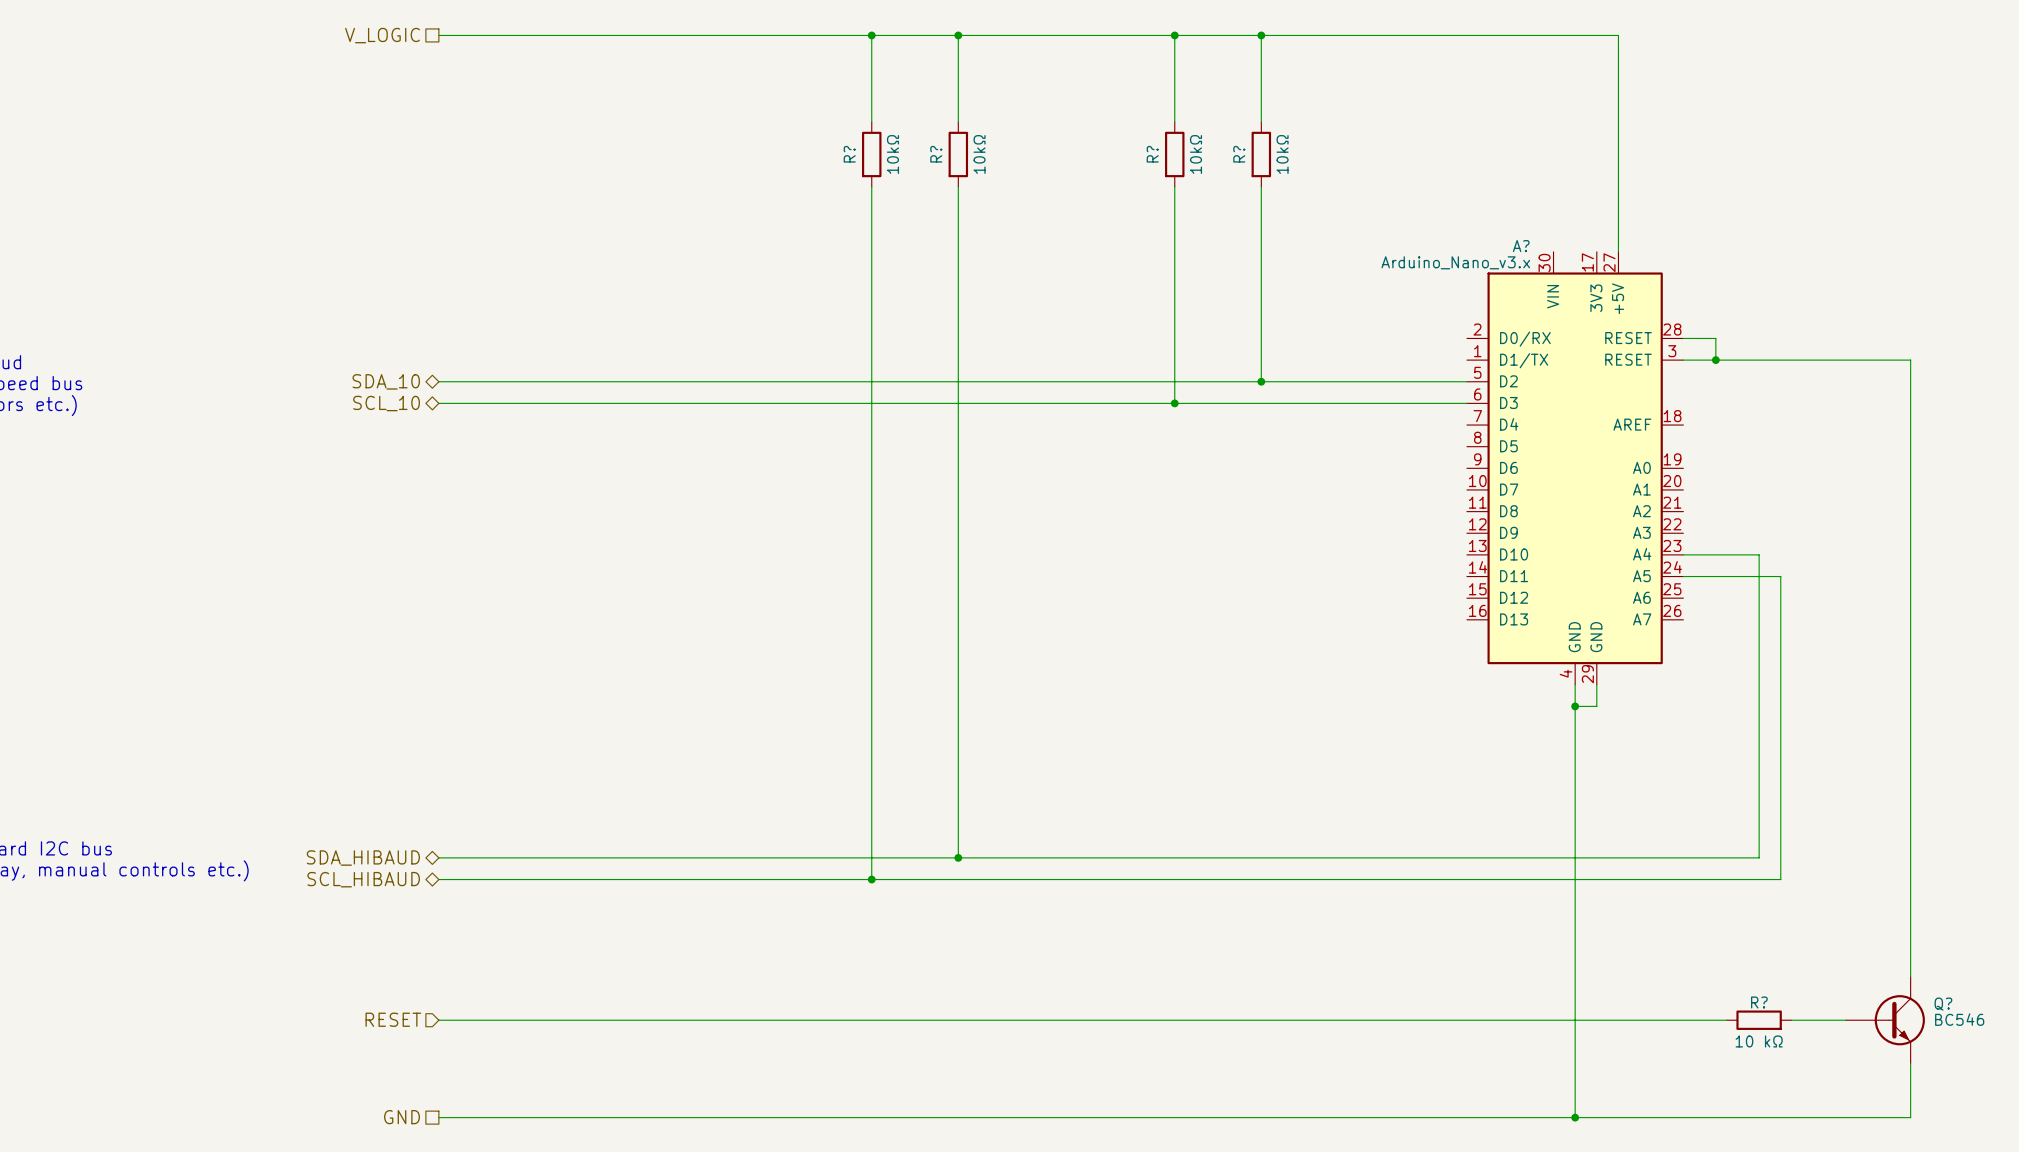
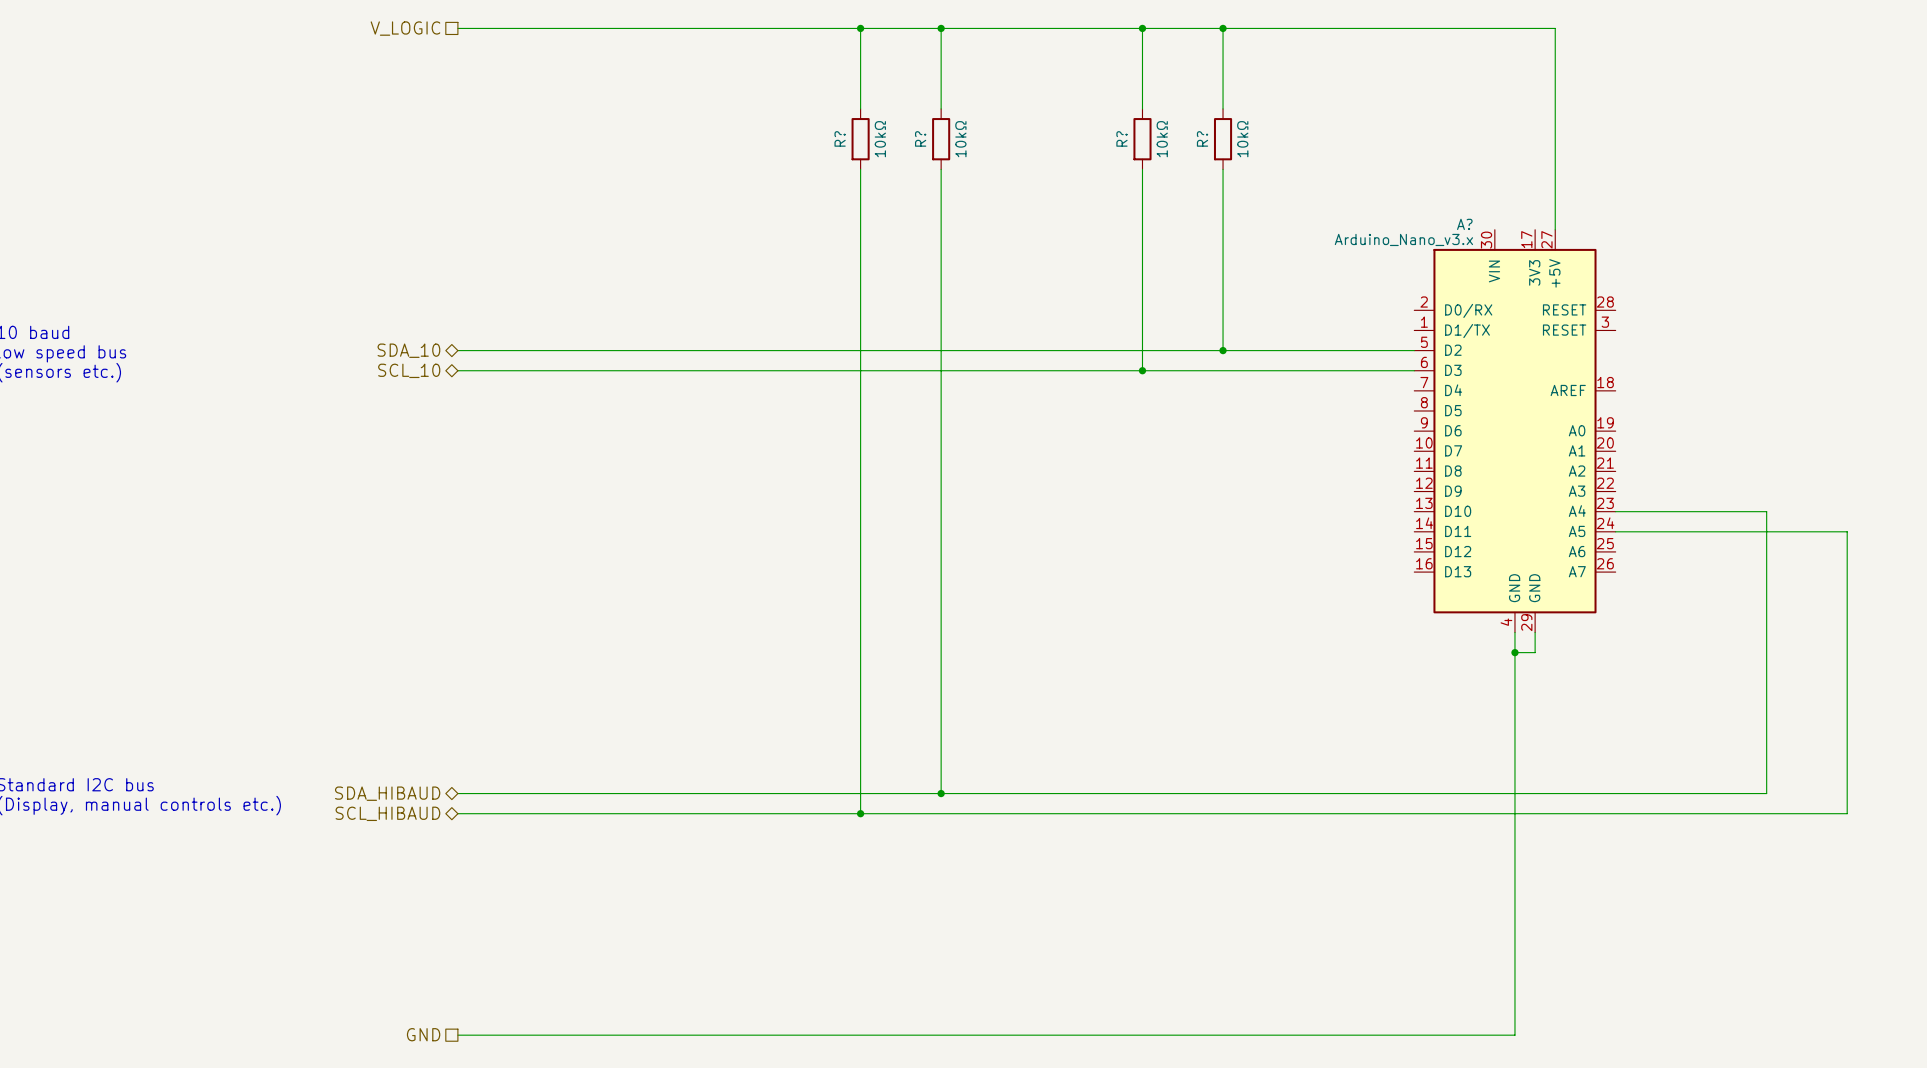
wire: (1683, 338) (1715, 338) (1715, 360) -> none
wire: (1683, 360) (1910, 360) (1910, 976) -> none
junction: (1715, 360) -> none
wire: (1759, 554) (1759, 857) -> (1686, 511) (1766, 511) (1766, 793) (1686, 793)
wire: (1780, 576) (1780, 879) -> (1706, 531) (1847, 531) (1847, 813) (1706, 813)
hierarchical label: RESET (393, 1019) -> none
wire: (438, 1020) (1726, 1020) -> none
R?: 10 kΩ (1759, 1020) -> none
wire: (1791, 1020) (1845, 1020) -> none
Q?: BC546 (1885, 1020) -> none
wire: (1910, 1063) (1910, 1117) (1575, 1117) -> none
junction: (1575, 1117) -> none

